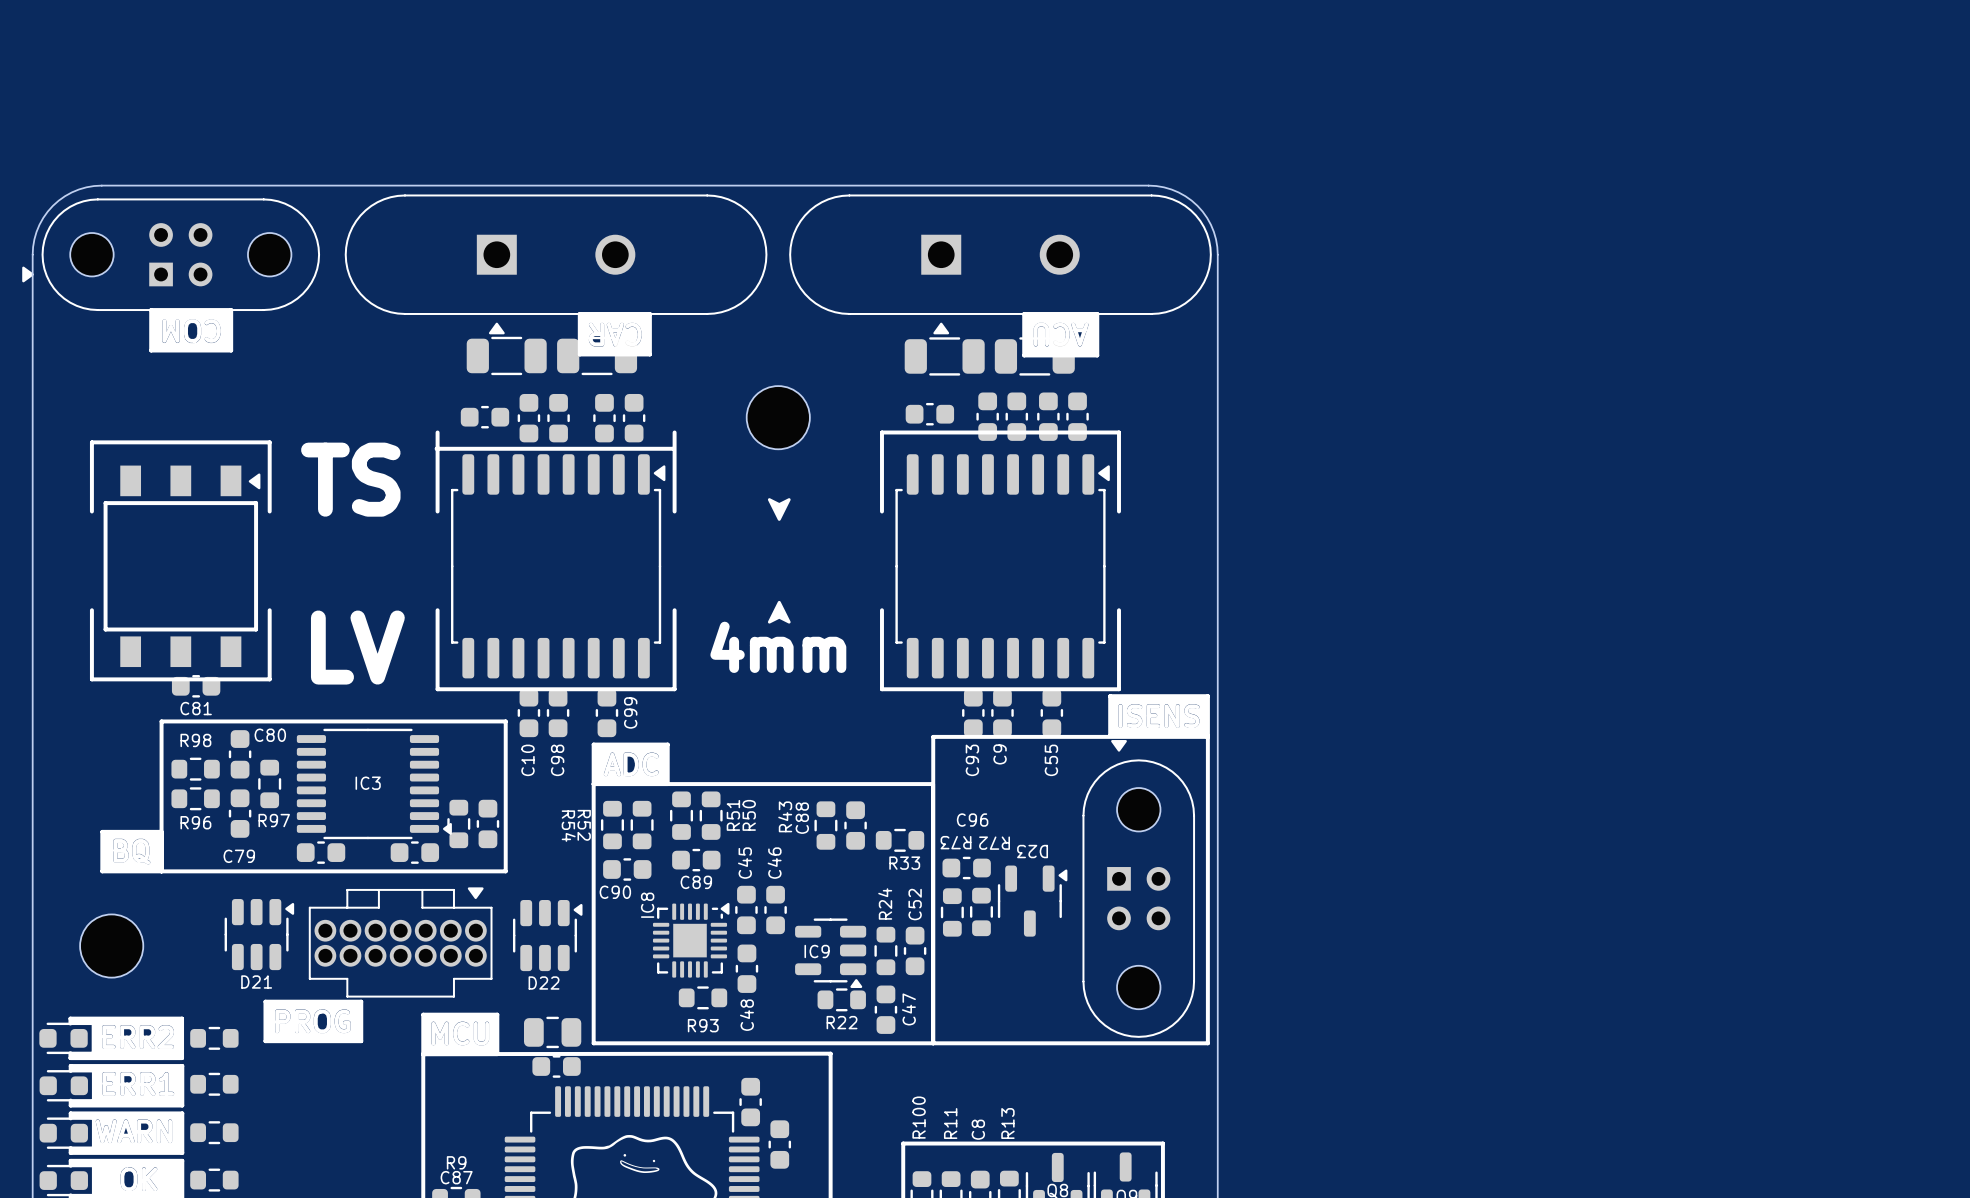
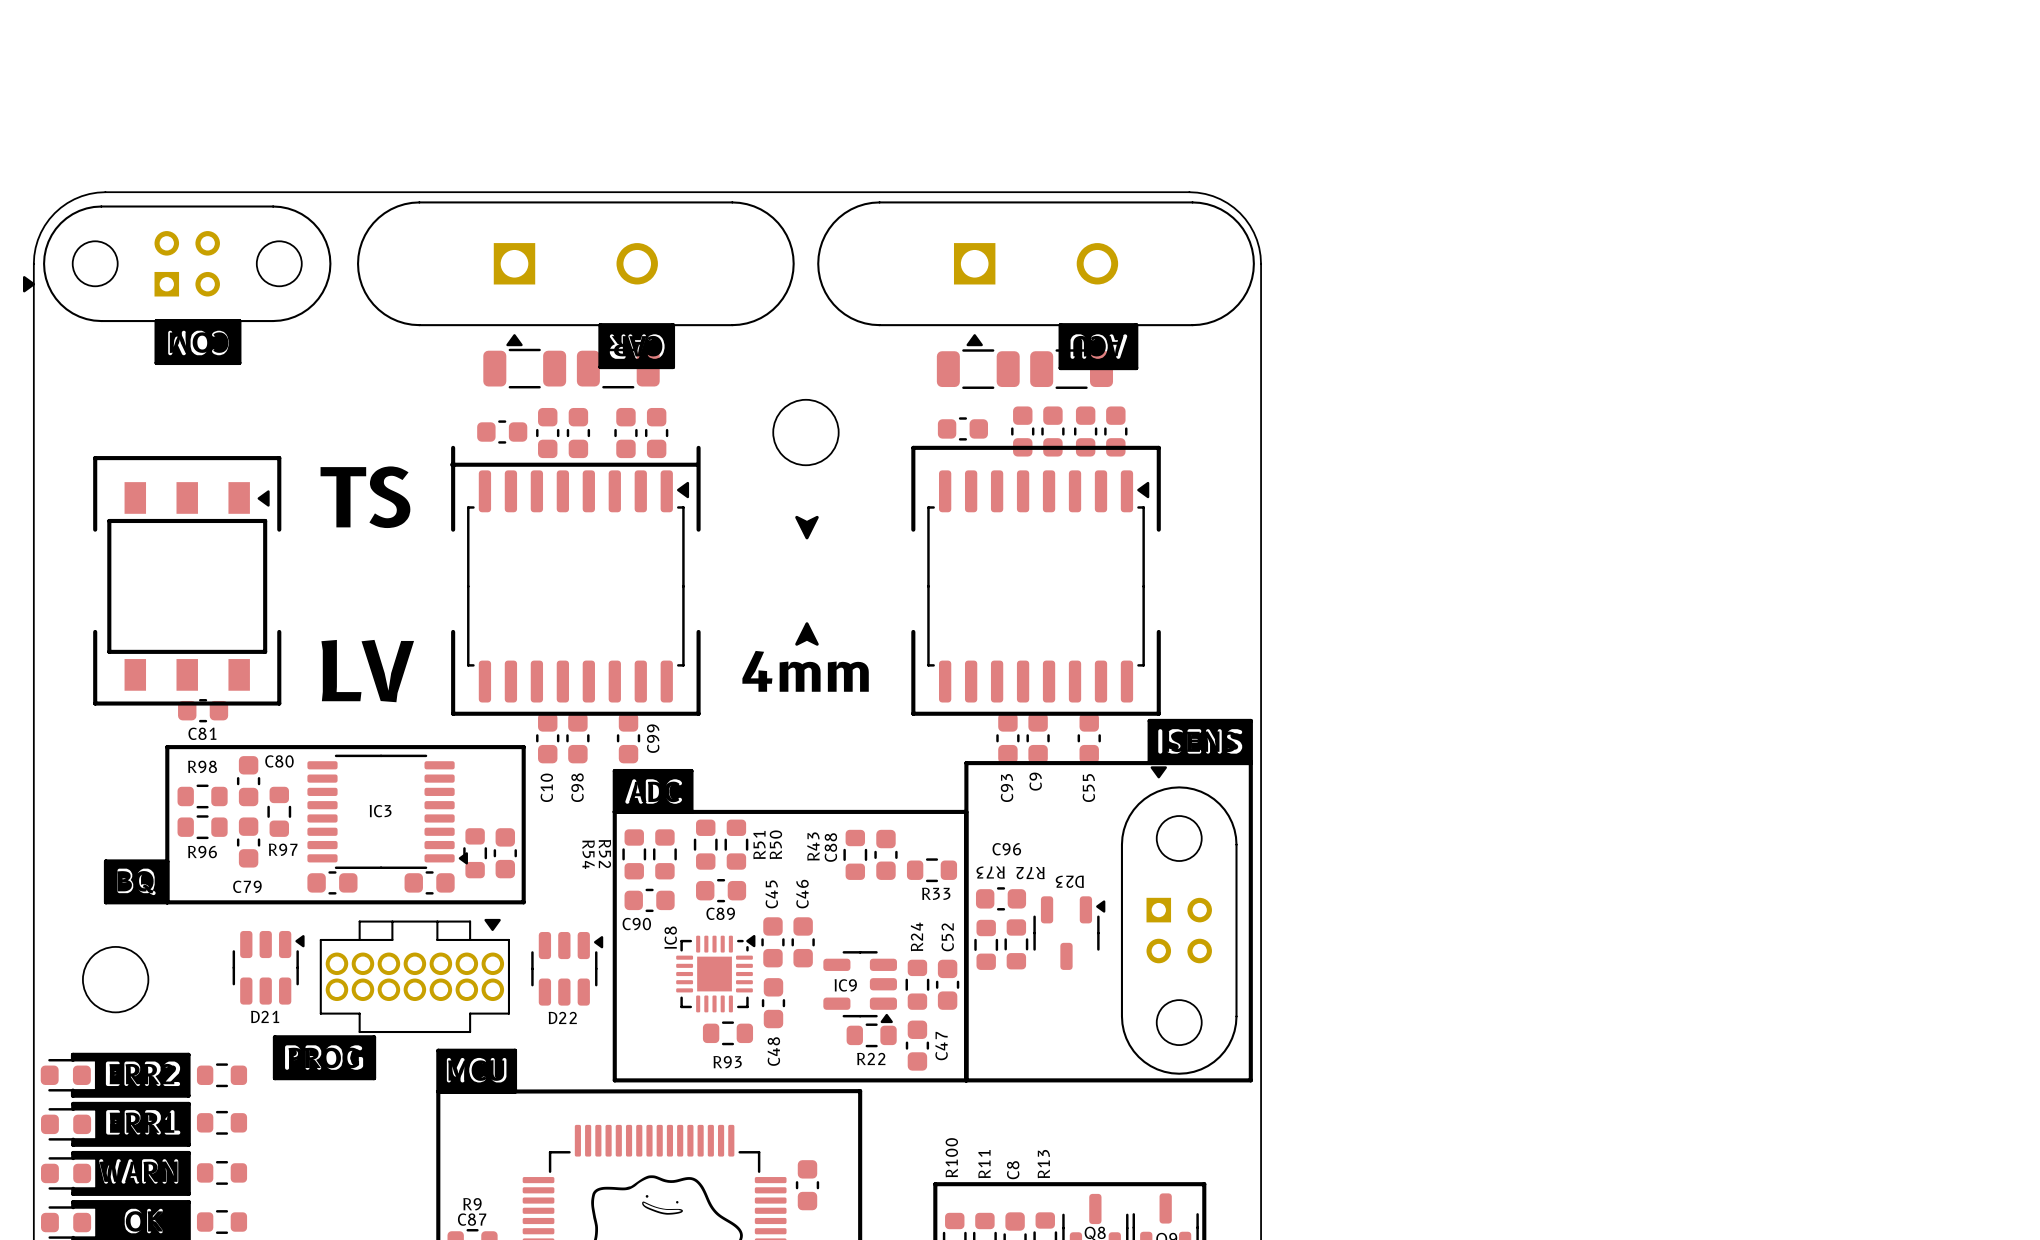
part: (552, 1032) -> none
part: (556, 1066) -> none
part: (750, 1102) -> none

